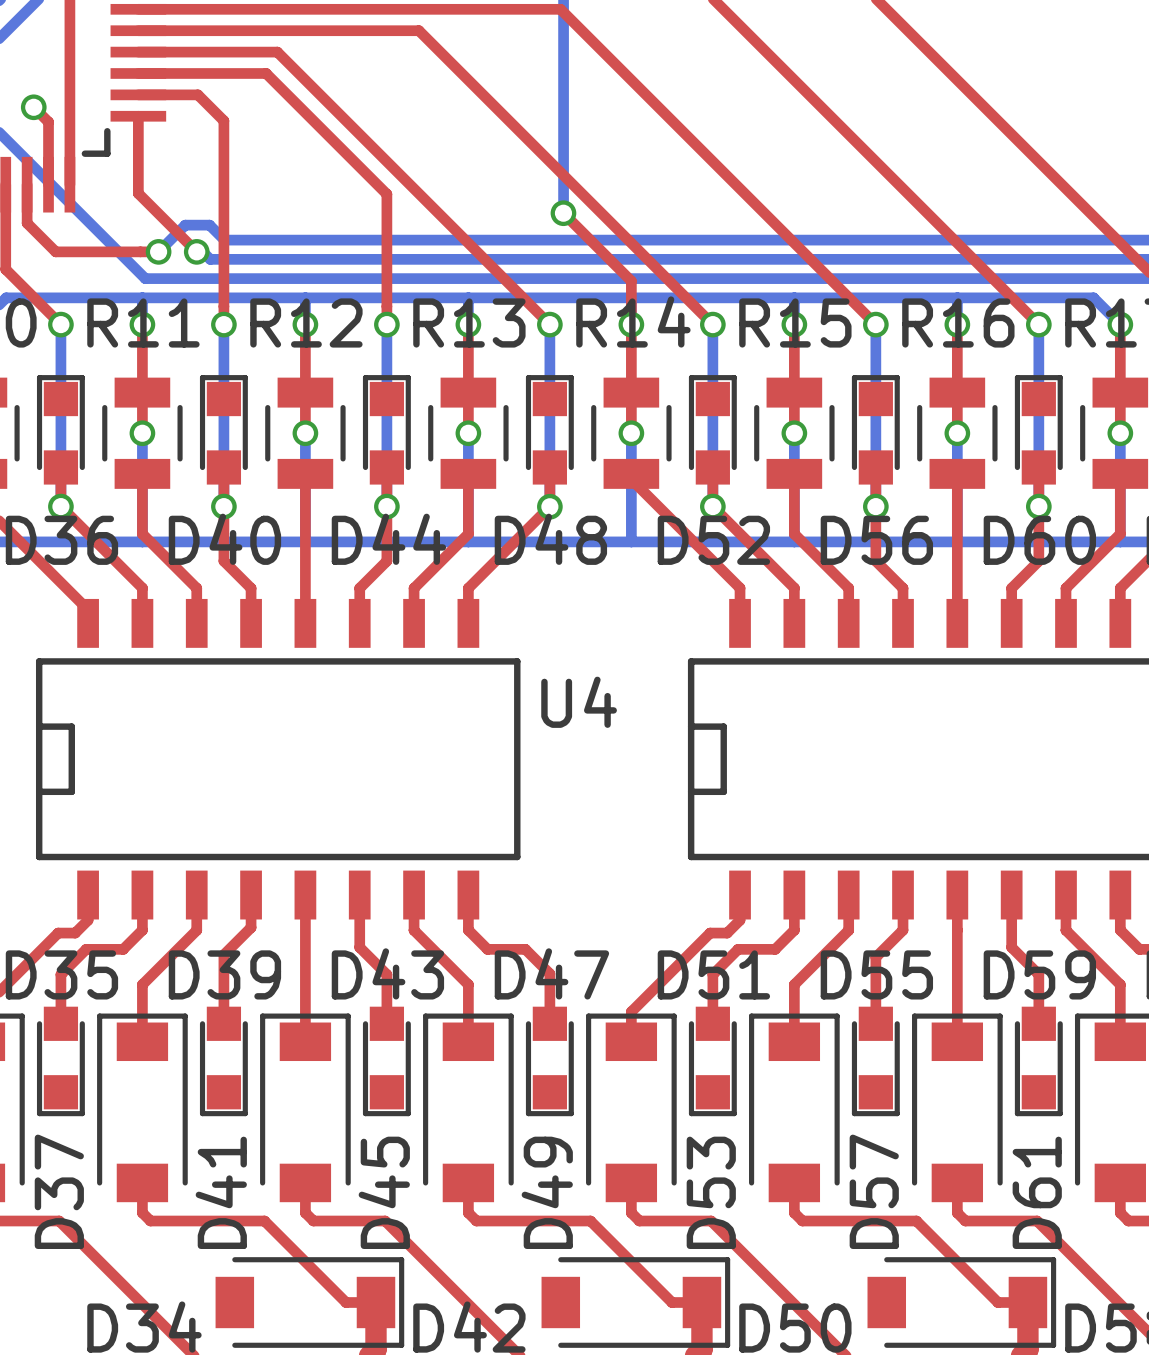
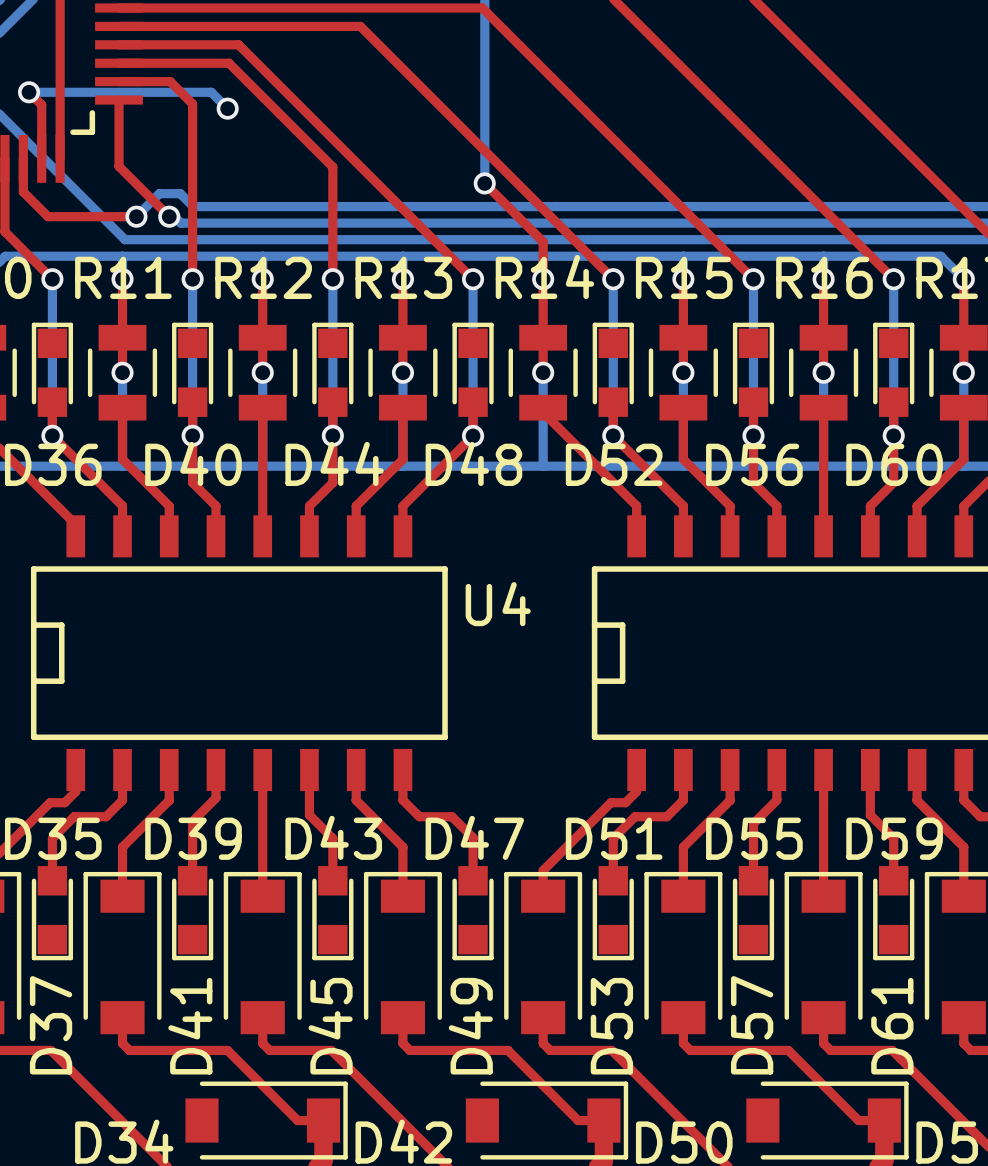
bottom track: none -> (29, 92) (211, 92) (227, 108)
via: none -> (227, 108)

